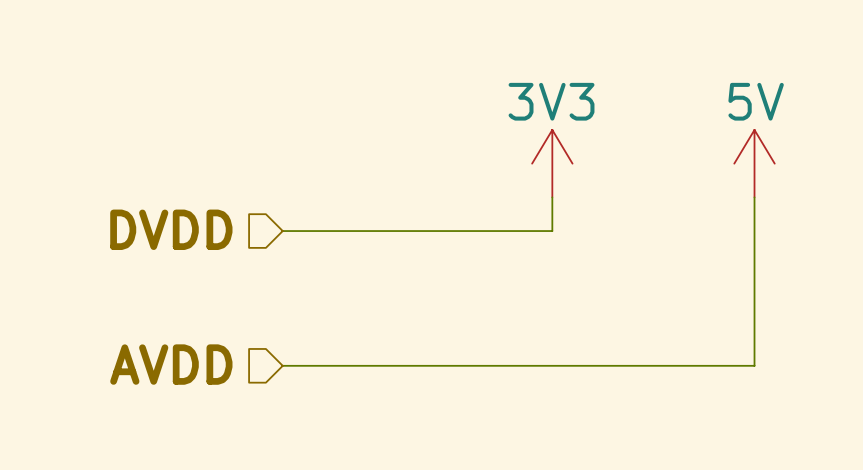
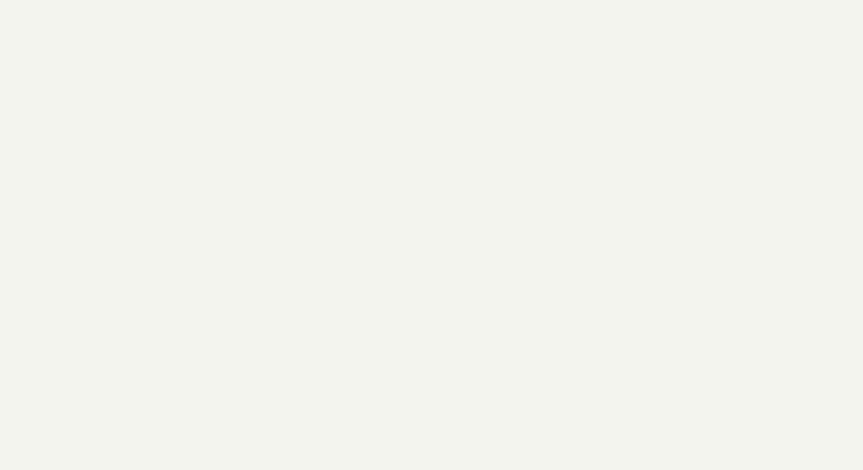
power symbol: 3V3 (552, 163) -> none
power symbol: 5V (754, 163) -> none
wire: (552, 197) (552, 231) (282, 231) -> none
wire: (754, 197) (754, 365) (282, 365) -> none
hierarchical label: DVDD (171, 229) -> none
hierarchical label: AVDD (171, 364) -> none

